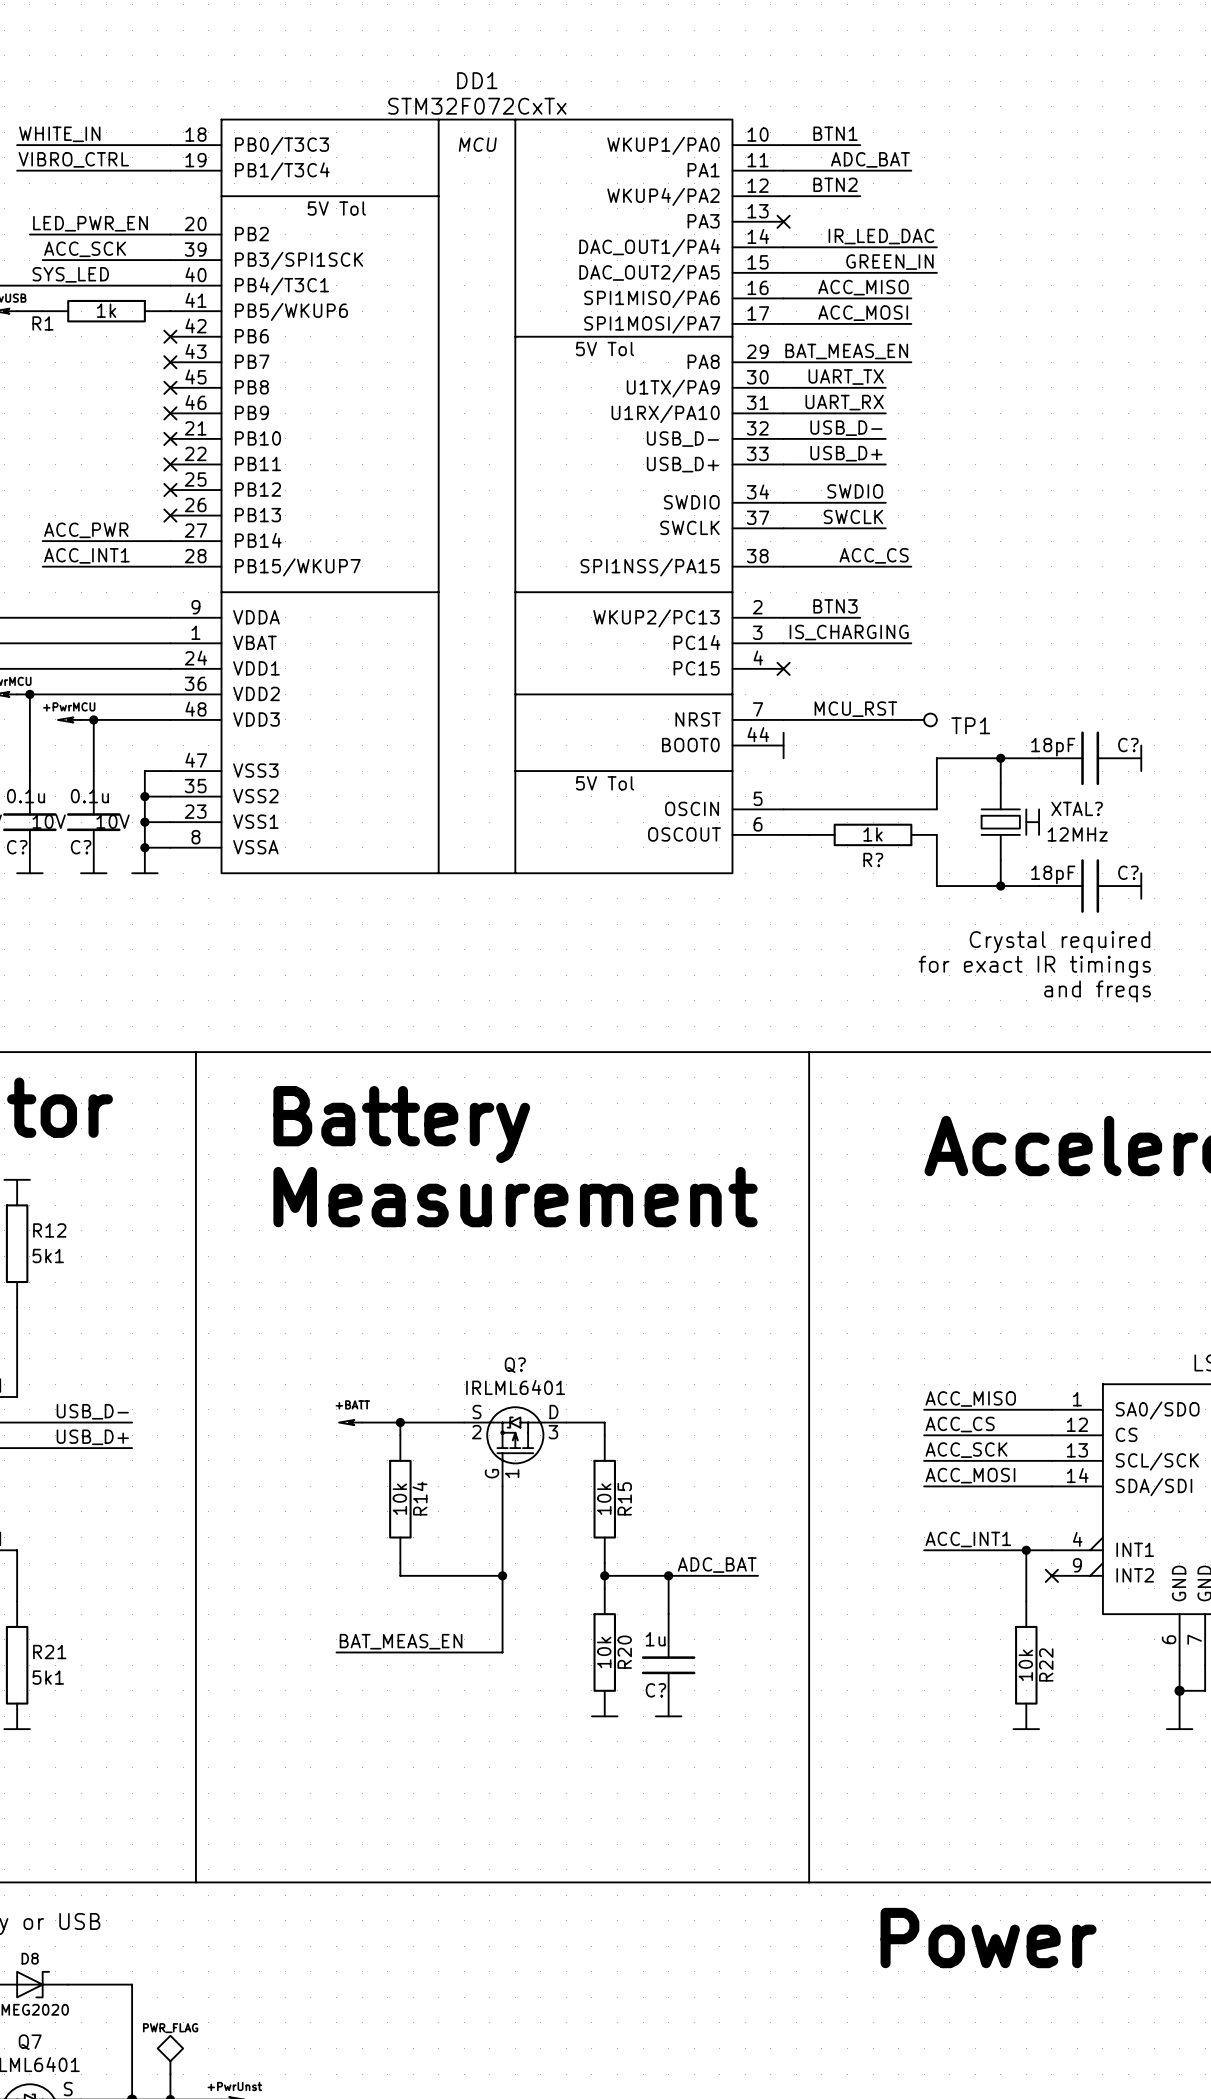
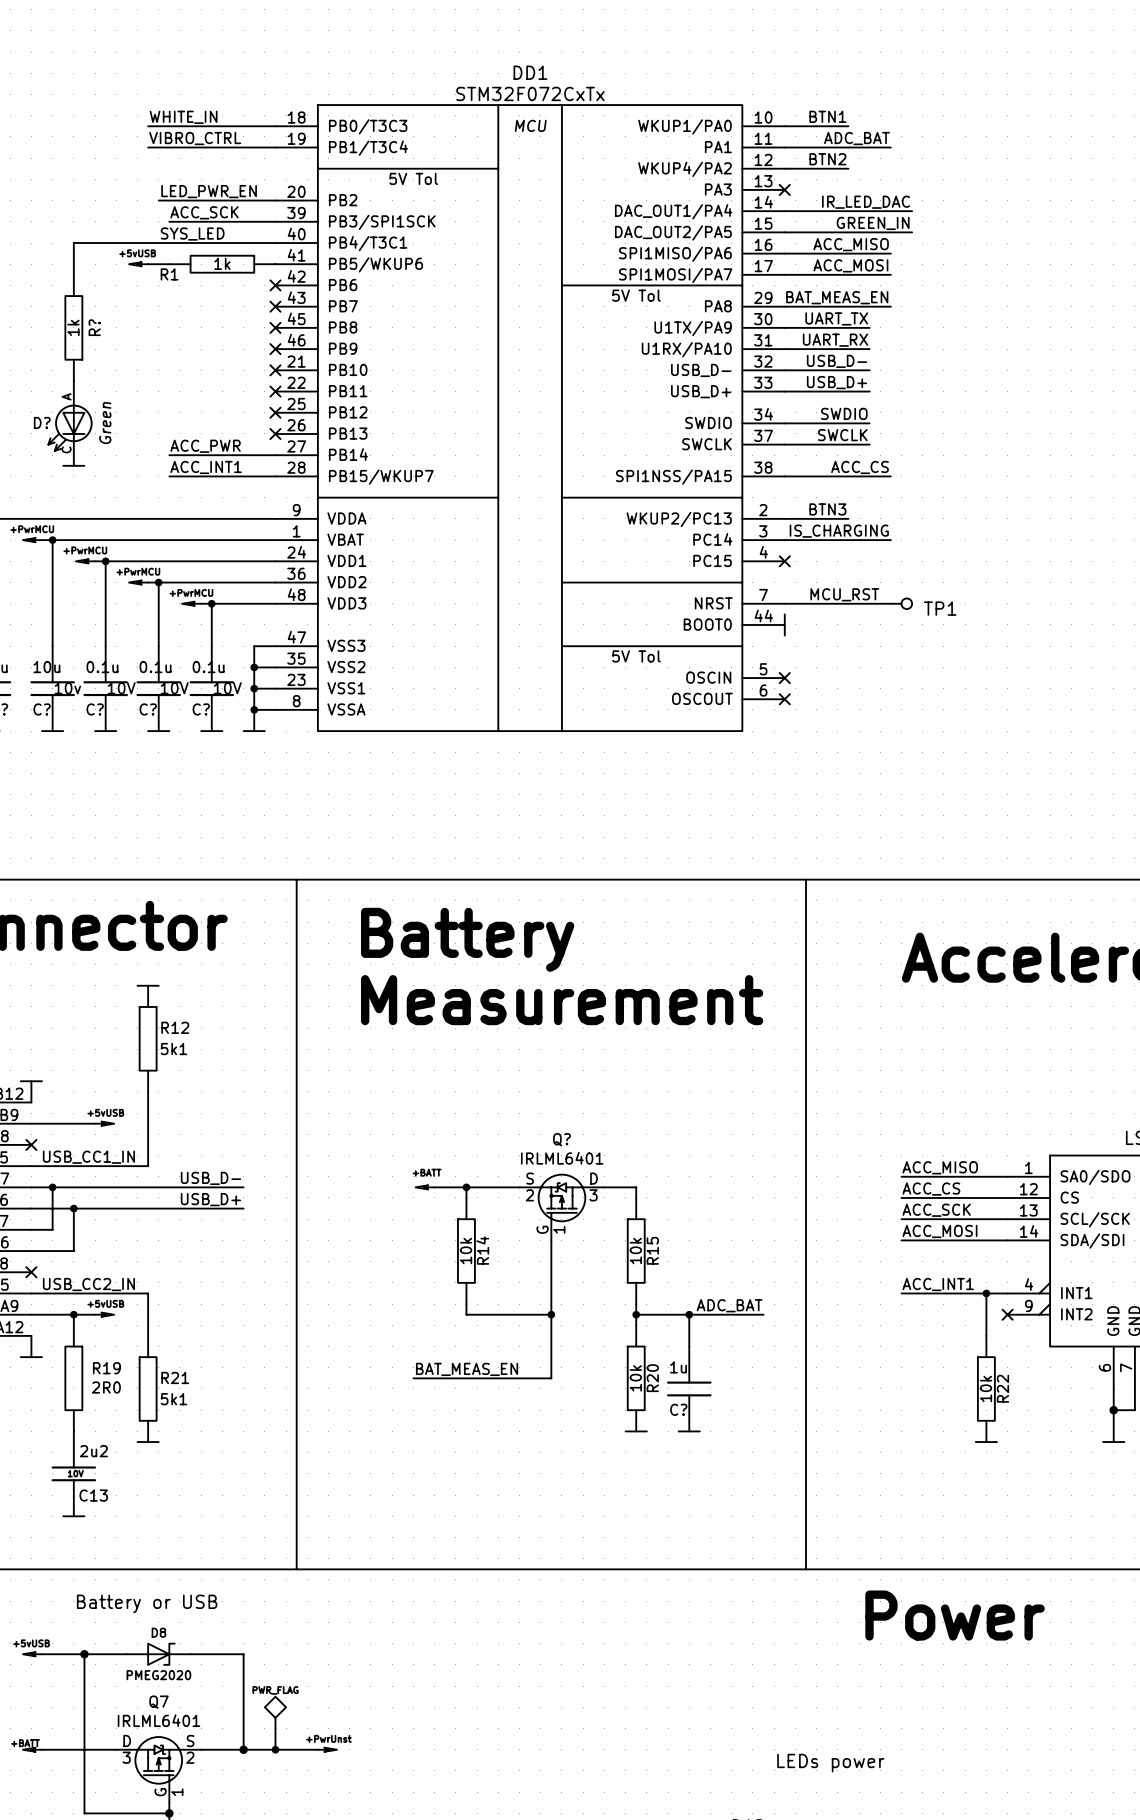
wire: (1000, 758) (1000, 783) -> none
junction: (1000, 758) -> none
wire: (1039, 758) (936, 758) (936, 809) (783, 809) -> none
C?: 18pF (1090, 758) -> none
power symbol: (1141, 758) -> none
no-connect mark: none -> (784, 678)
XTAL?: 12MHz (1010, 822) -> none
power symbol: (1039, 822) -> none
wire: (783, 834) (809, 834) -> none
no-connect mark: none -> (784, 699)
R?: 1k (873, 834) -> none
wire: (936, 834) (936, 886) (1039, 886) -> none
wire: (1000, 860) (1000, 886) -> none
junction: (1000, 886) -> none
C?: 18pF (1090, 886) -> none
power symbol: (1141, 886) -> none
text: Crystal required (1059, 942) -> none
text: for exact IR timings (1034, 966) -> none
text: and freqs (1097, 991) -> none

